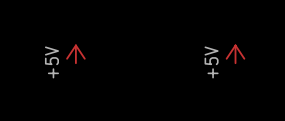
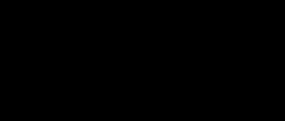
power symbol: +5V (75, 53) -> none
power symbol: +5V (235, 53) -> none

